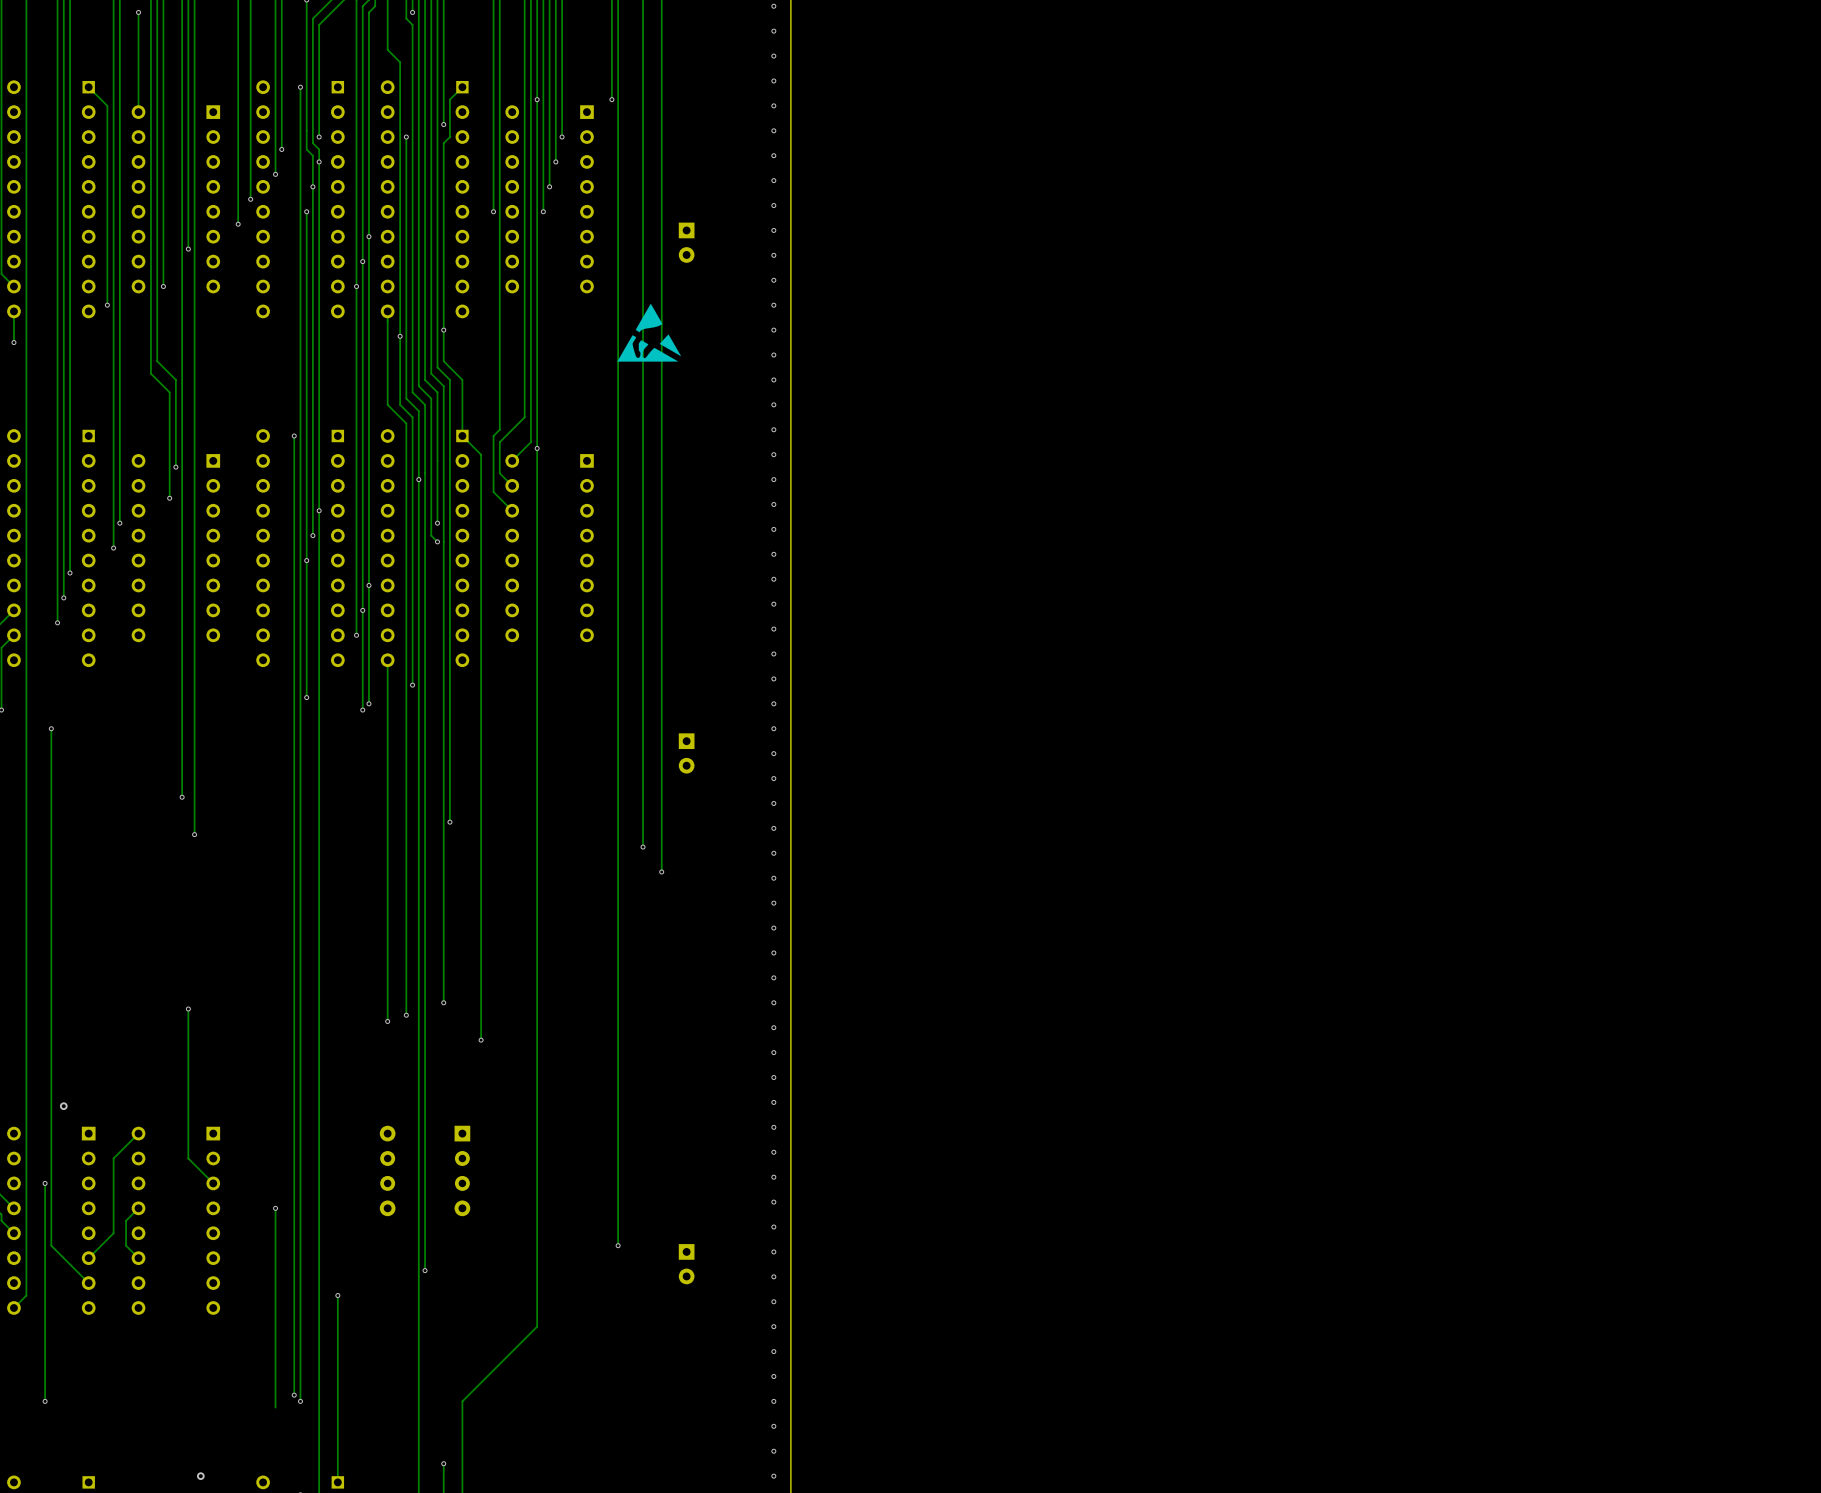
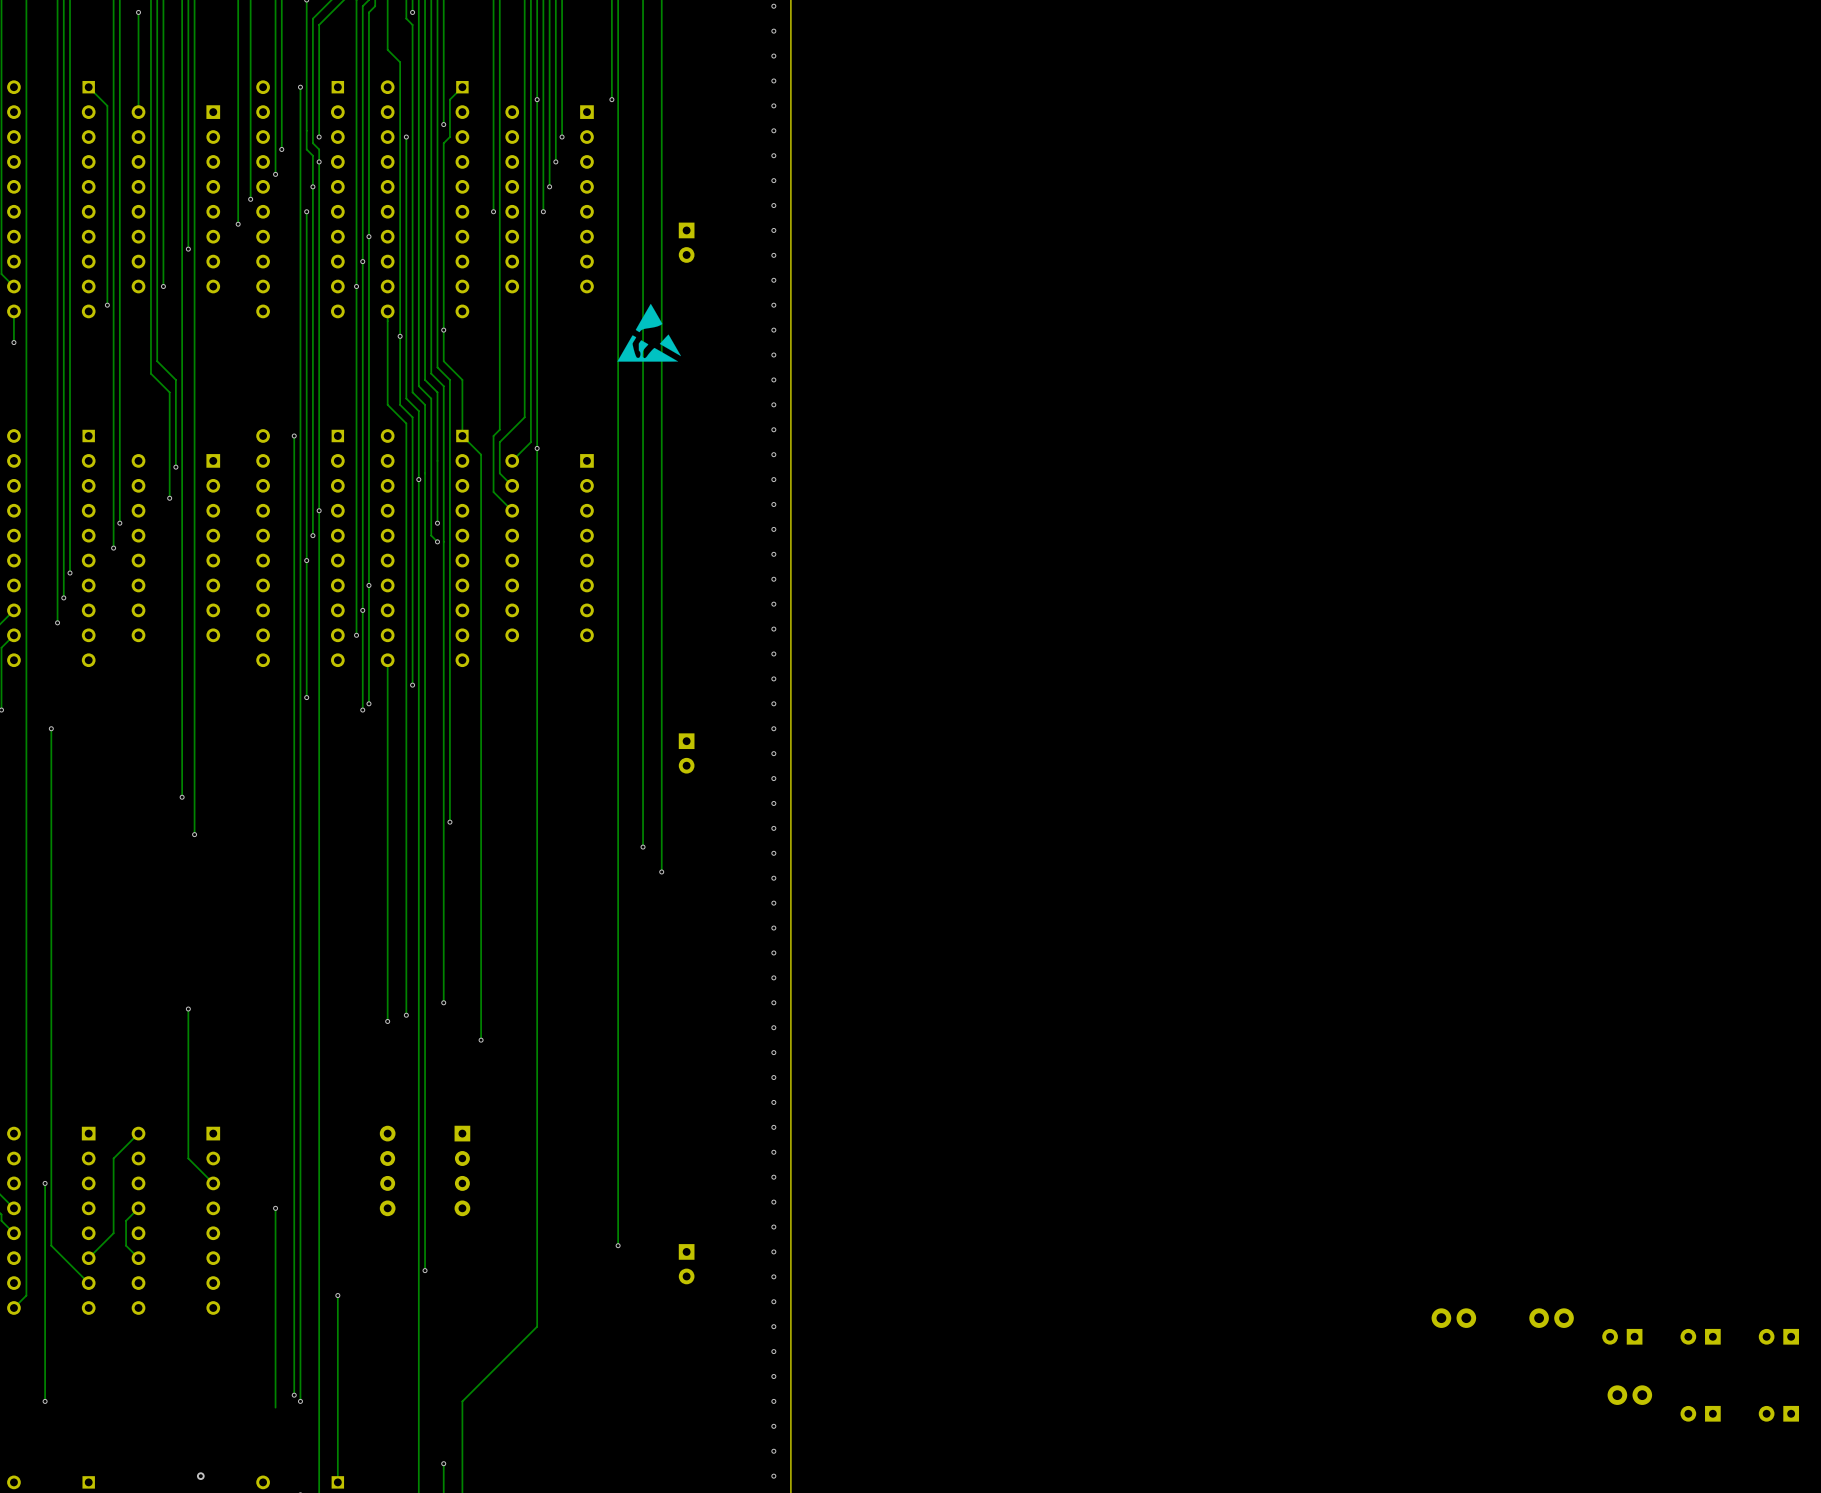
via: (63, 1106) -> none
part: none -> (1453, 1318)
part: none -> (1551, 1318)
part: none -> (1622, 1336)
part: none -> (1700, 1336)
part: none -> (1778, 1336)
part: none -> (1629, 1395)
part: none -> (1700, 1413)
part: none -> (1778, 1413)

